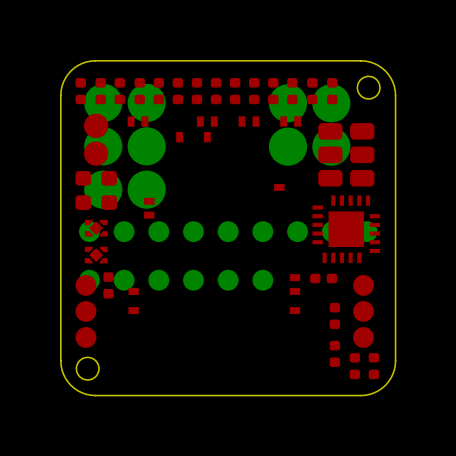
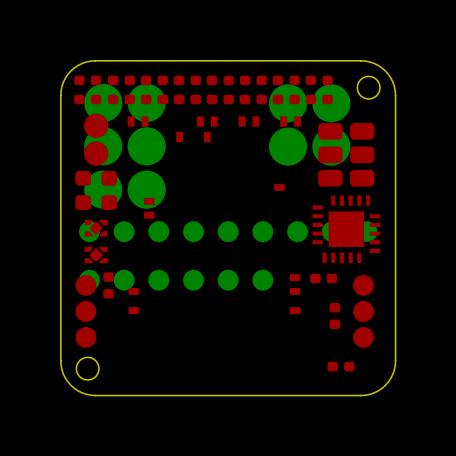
part: none -> (87, 80)
part: none -> (121, 80)
part: none -> (154, 80)
part: none -> (187, 80)
part: none -> (220, 80)
part: none -> (253, 80)
part: none -> (286, 80)
part: none -> (319, 80)
part: (80, 91) -> none
part: (100, 91) -> none
part: (119, 91) -> none
part: (139, 91) -> none
part: (158, 91) -> none
part: (177, 91) -> none
part: (196, 91) -> none
part: (216, 91) -> none
part: (235, 91) -> none
part: (254, 91) -> none
part: (273, 91) -> none
part: (292, 91) -> none
part: (312, 91) -> none
part: (332, 91) -> none
part: none -> (87, 99)
part: none -> (121, 99)
part: none -> (154, 99)
part: none -> (187, 99)
part: none -> (220, 99)
part: none -> (253, 99)
part: none -> (286, 99)
part: none -> (319, 99)
part: (334, 353) -> none
part: none -> (340, 366)
part: (354, 366) -> none
part: (373, 366) -> none

